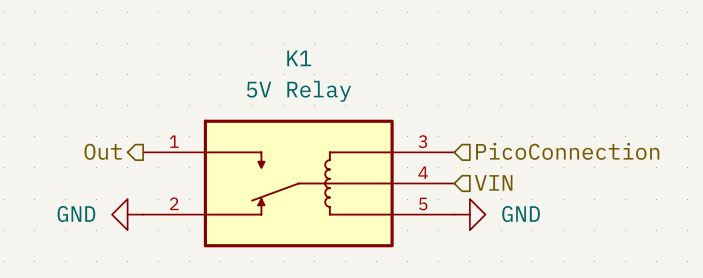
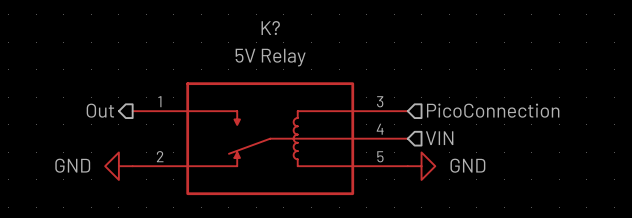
K1 name: K1 (299, 58) -> K? (270, 28)

